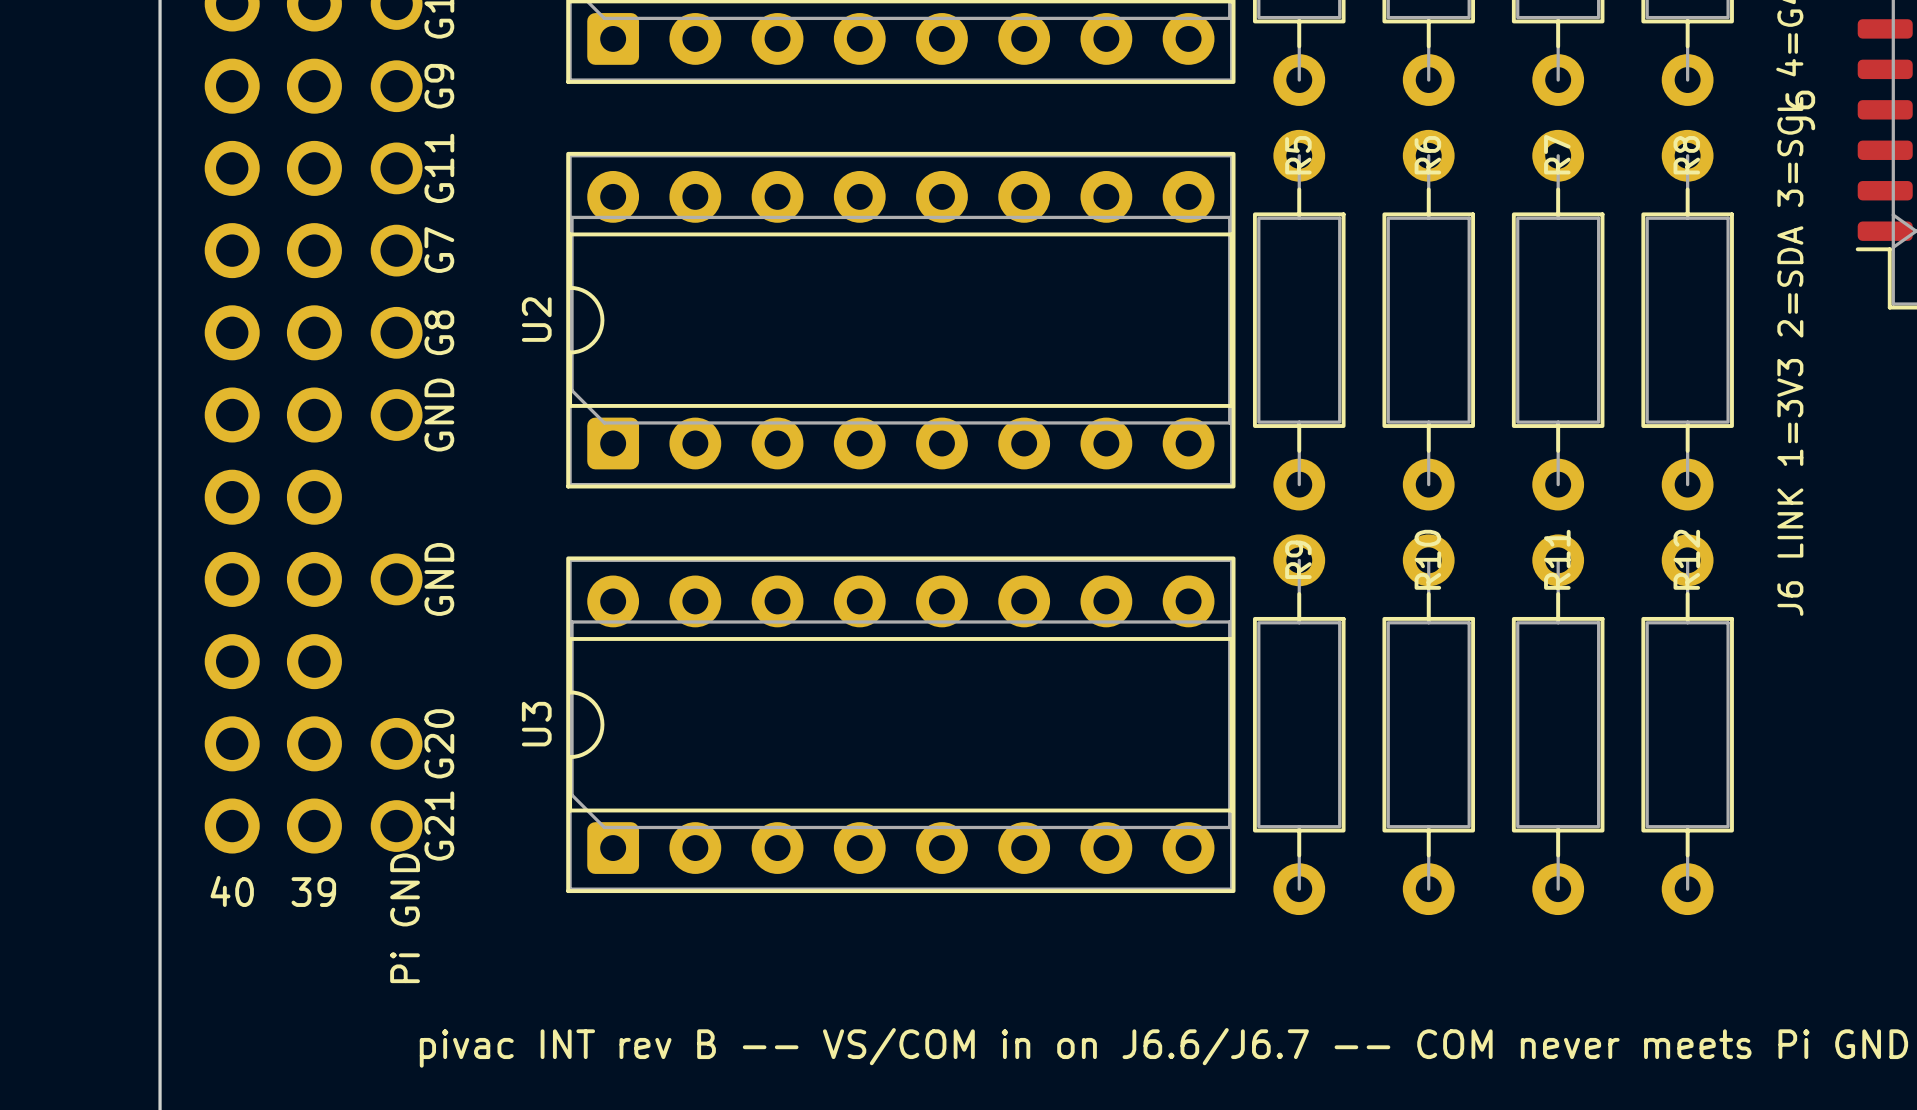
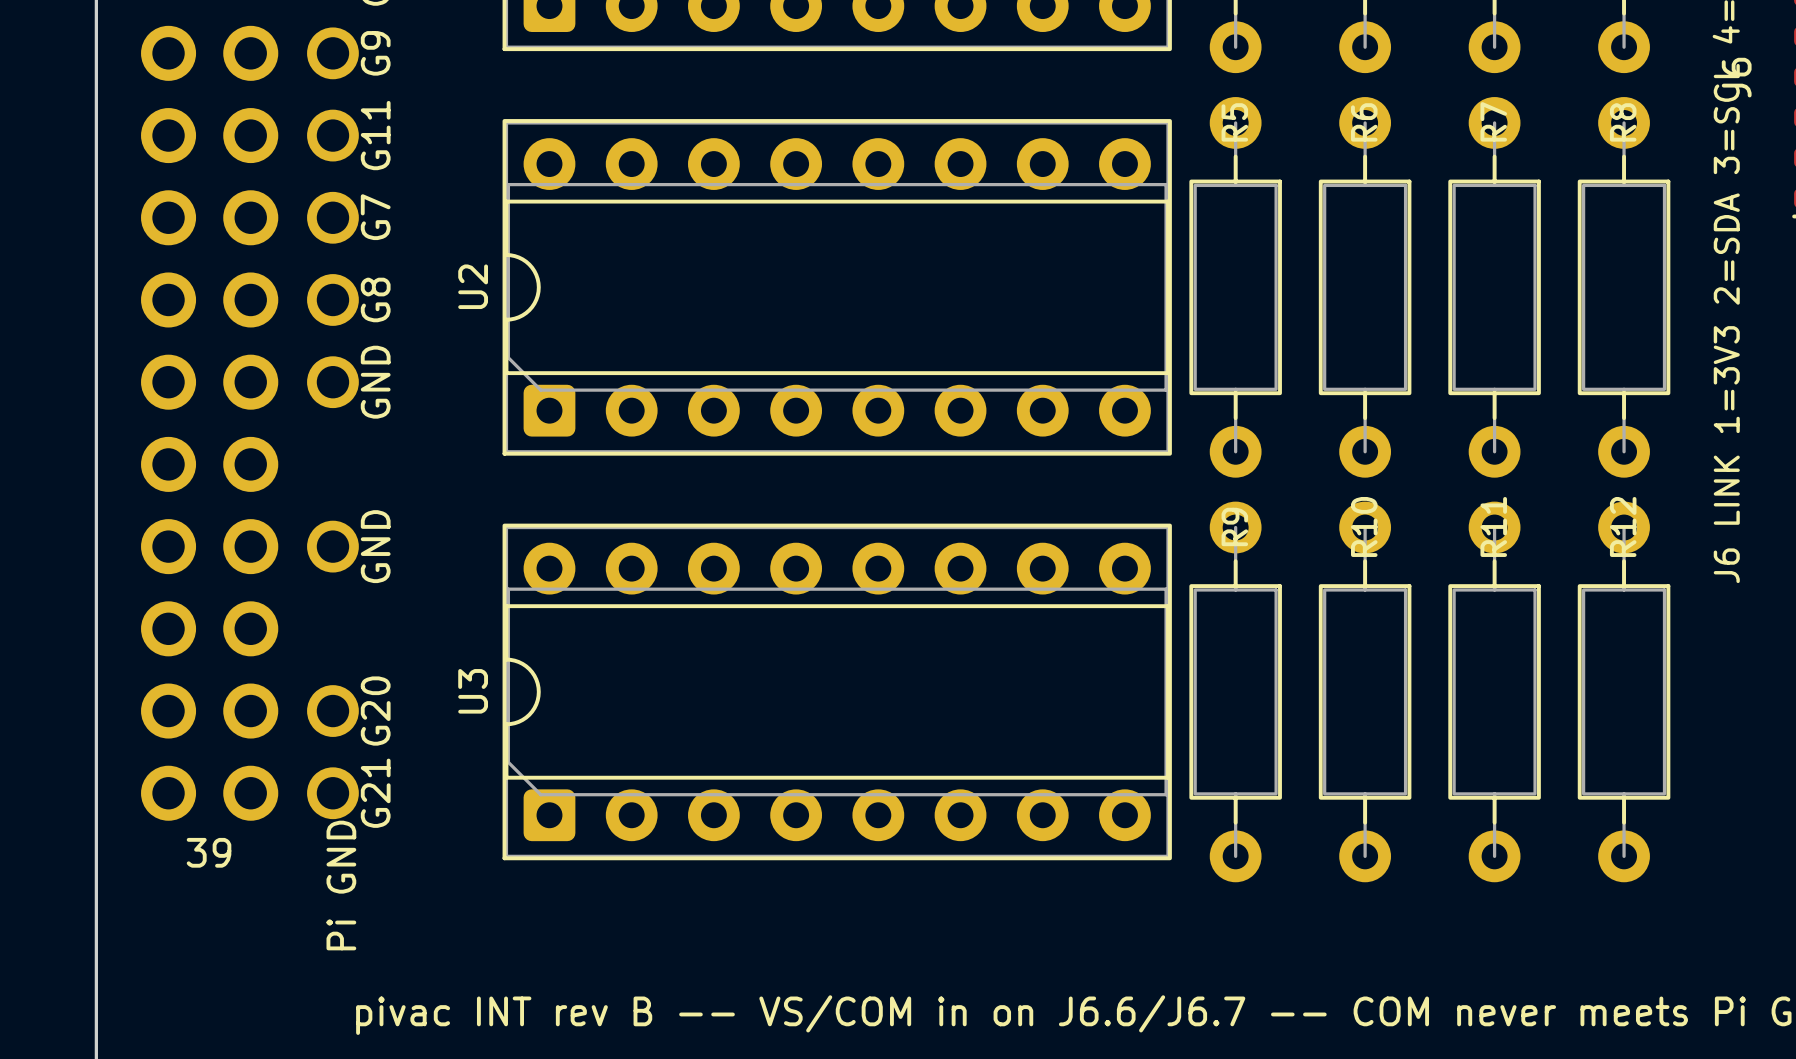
text: 40 (232, 891) -> none
text position: 39 (313, 892) -> 39 (209, 852)

